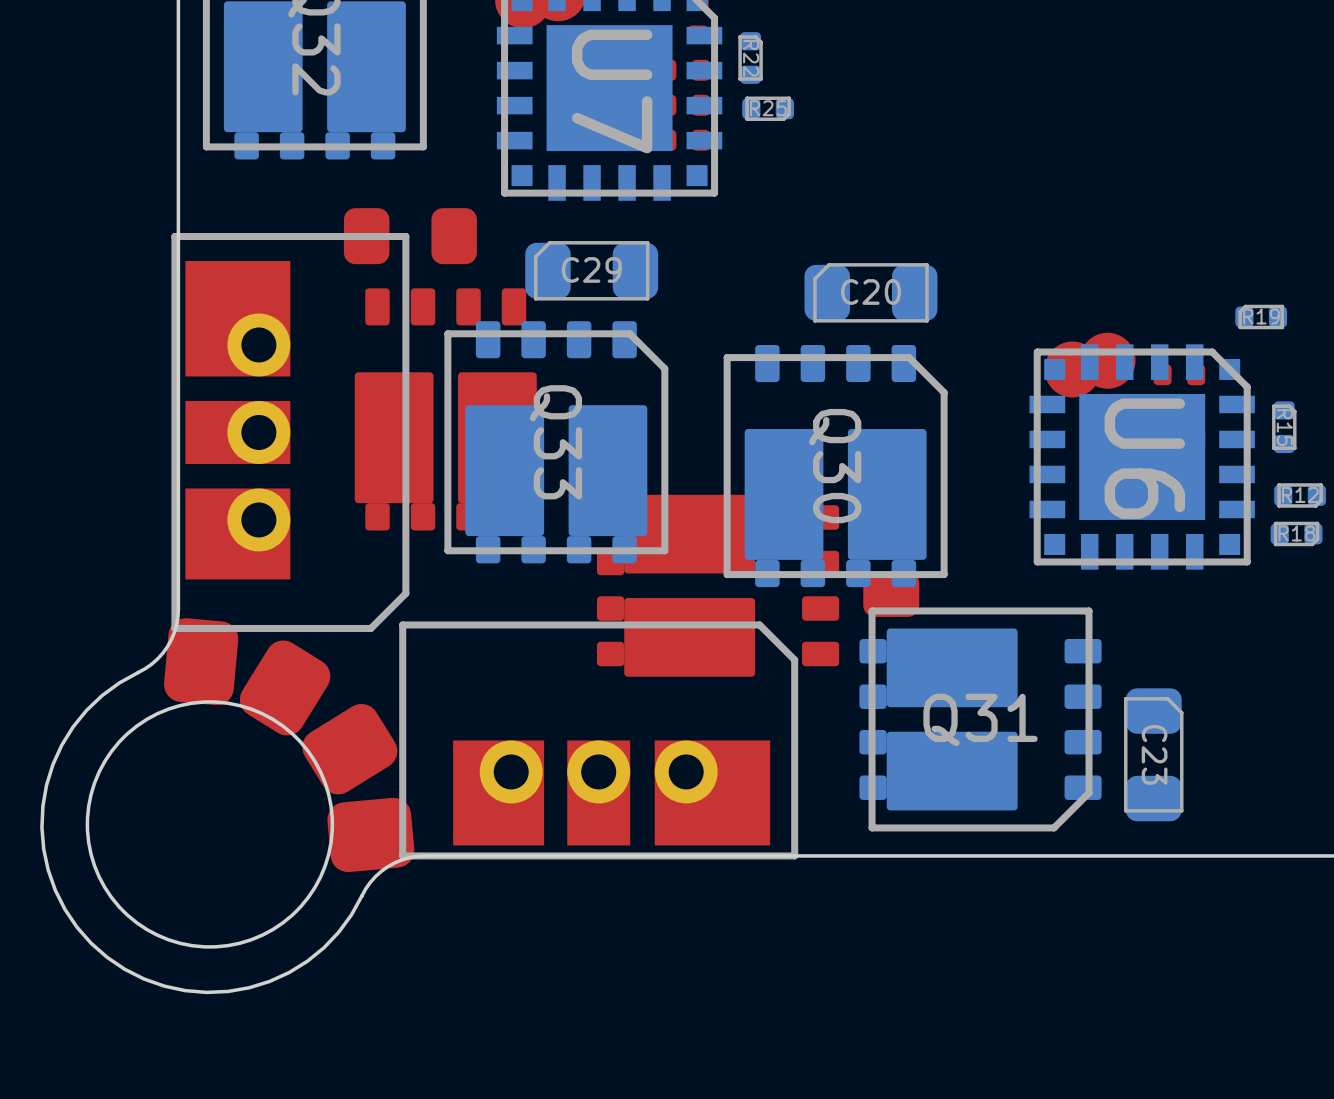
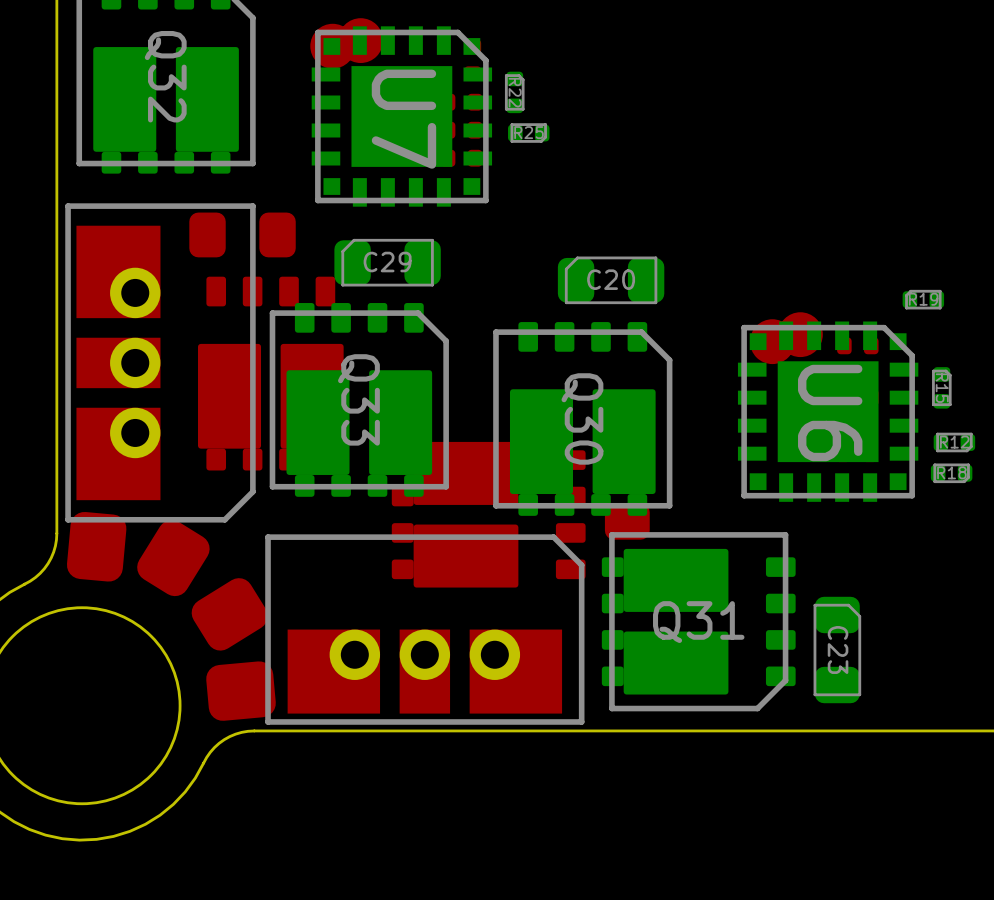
part footprint: [171, 232, 410, 632] -> [65, 203, 256, 523]
part footprint: [399, 621, 799, 860] -> [265, 534, 585, 725]
part position: (201, 661) -> (96, 546)
part position: (285, 687) -> (173, 558)
part position: (349, 749) -> (229, 614)
part position: (370, 834) -> (241, 691)

